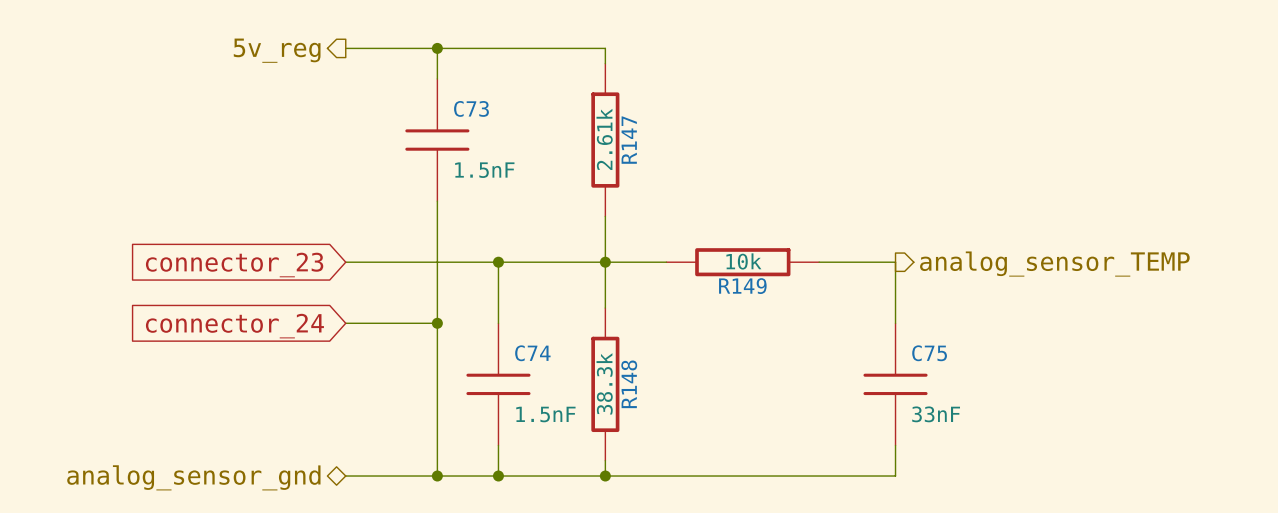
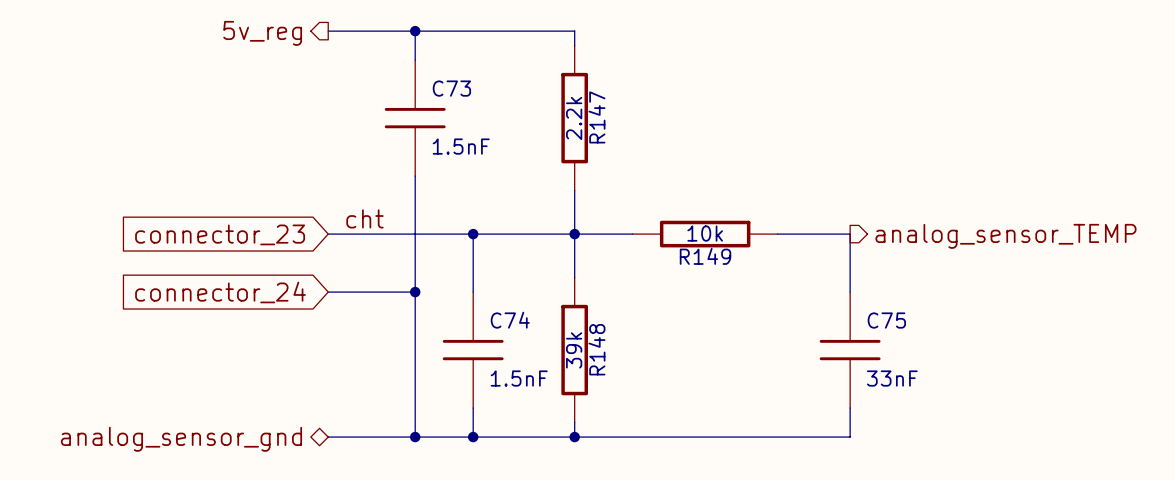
R147 value: 2.61k (604, 139) -> 2.2k (574, 118)
label: none -> cht (364, 218)
R148 value: 38.3k (604, 383) -> 39k (574, 350)

